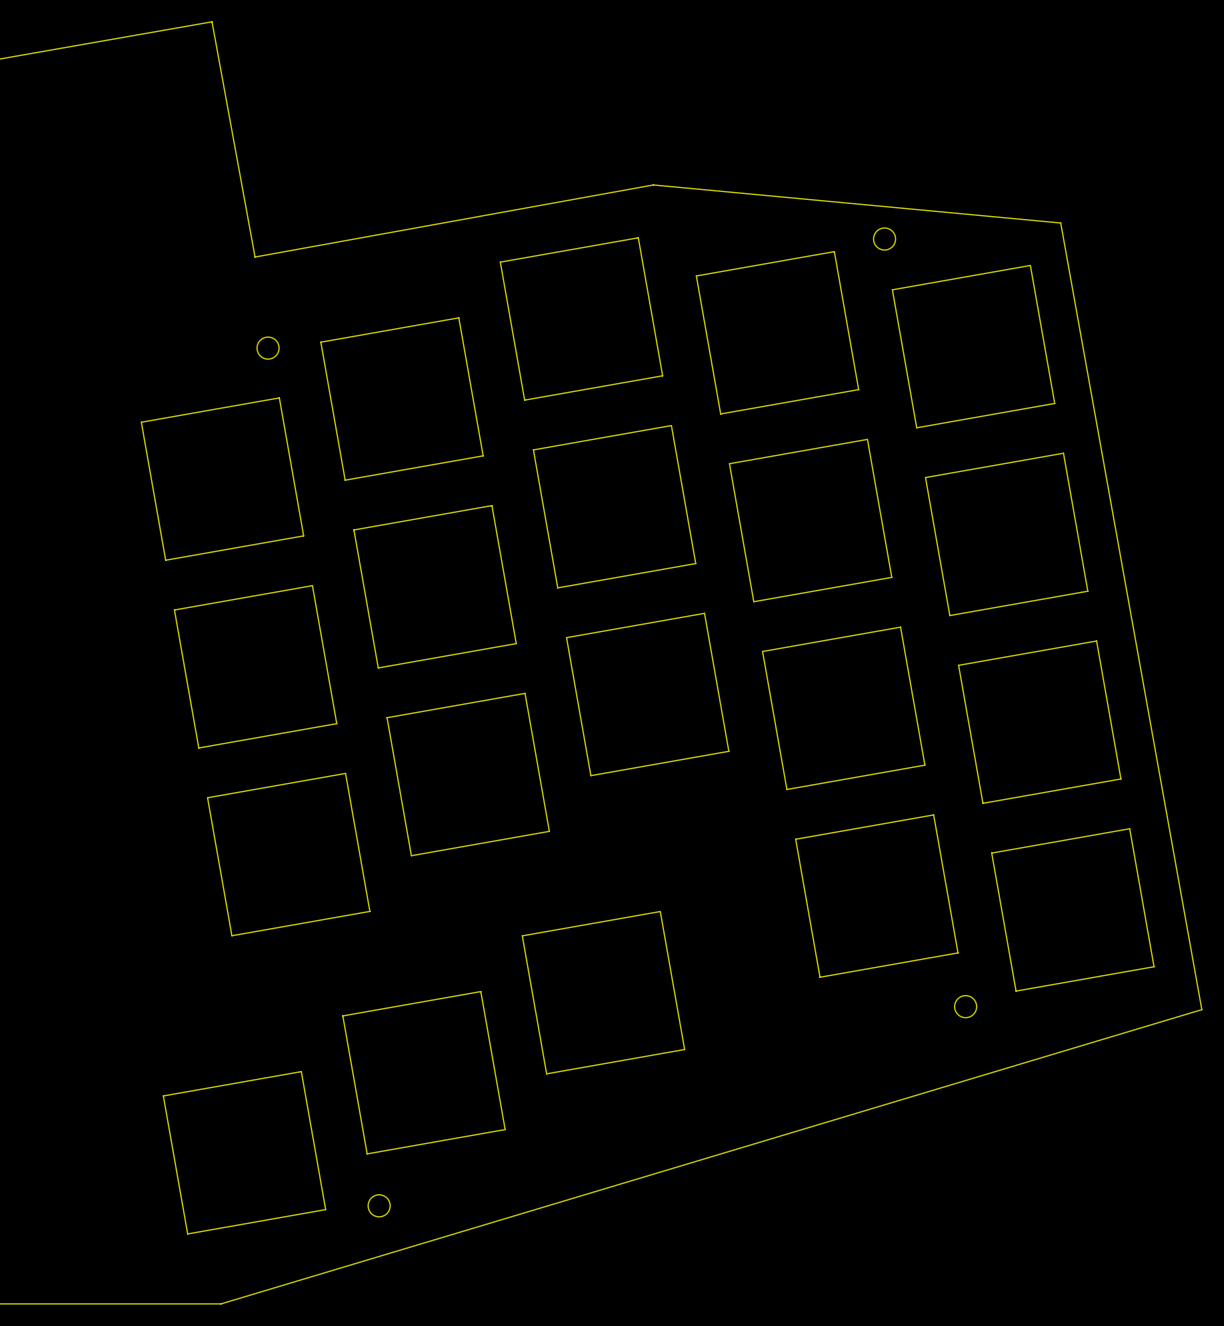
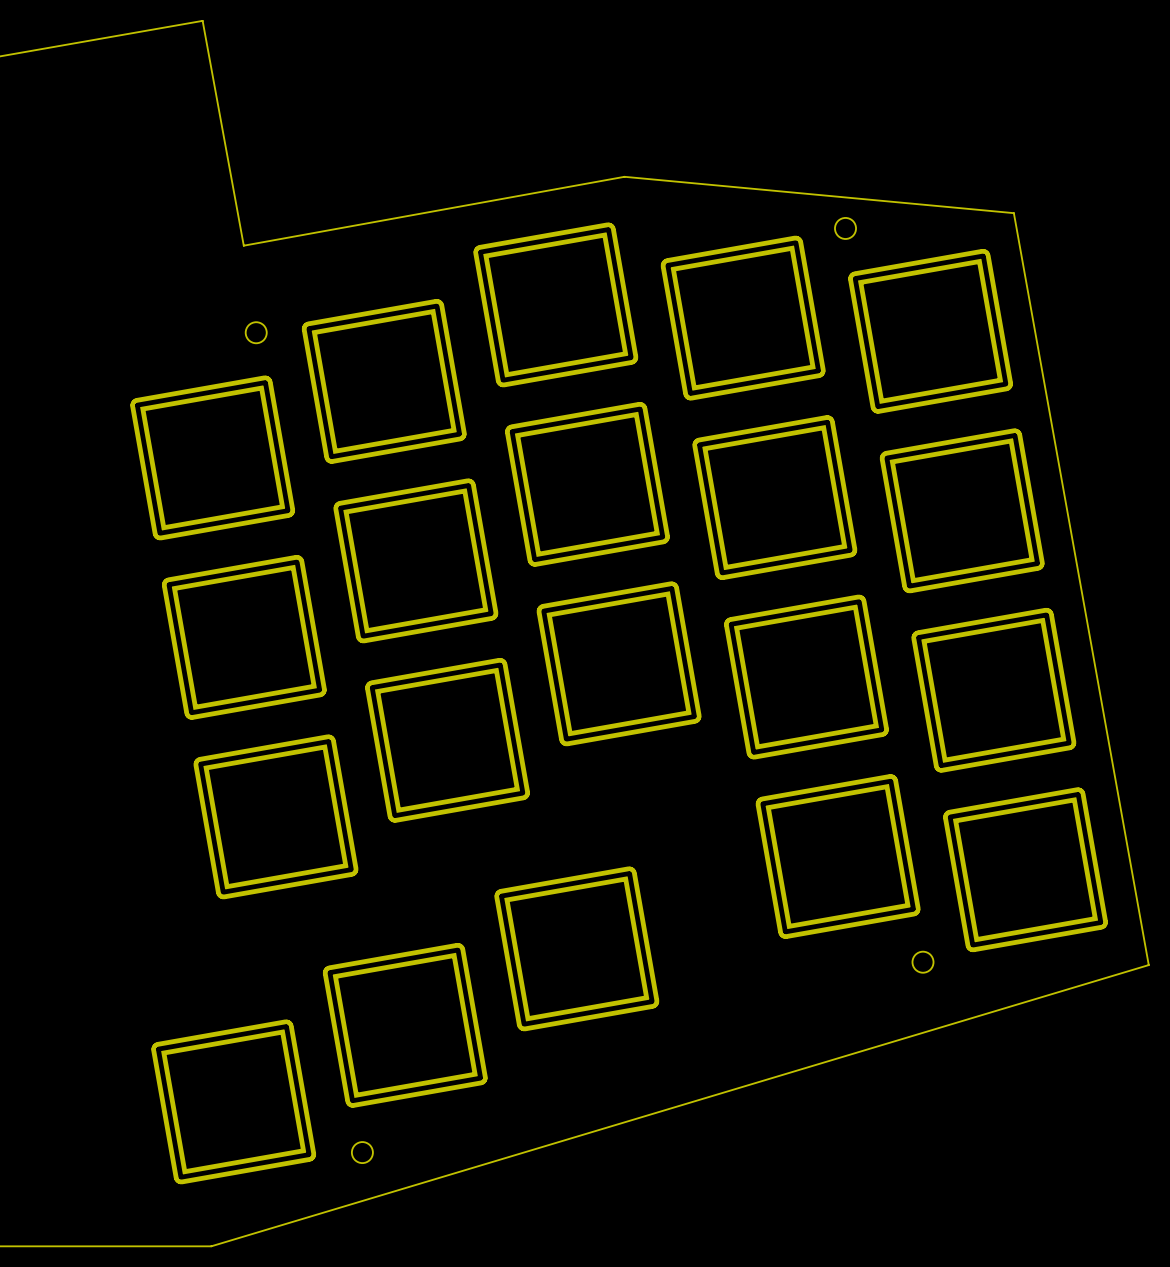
drawing: [499, 237, 664, 401] -> none
drawing: [532, 251, 860, 589] -> none
drawing: [565, 264, 1056, 777] -> none
drawing: [320, 317, 484, 481] -> none
part: none -> (555, 304)
part: none -> (743, 318)
part: none -> (930, 331)
drawing: [140, 397, 305, 561] -> none
part: none -> (384, 381)
drawing: [761, 452, 1089, 791] -> none
part: none -> (212, 457)
drawing: [353, 505, 517, 669] -> none
part: none -> (587, 484)
part: none -> (774, 497)
part: none -> (962, 510)
drawing: [173, 585, 338, 749] -> none
part: none -> (415, 560)
drawing: [795, 640, 1122, 978] -> none
part: none -> (244, 637)
drawing: [386, 692, 550, 857] -> none
part: none -> (619, 663)
part: none -> (806, 677)
part: none -> (993, 690)
drawing: [206, 772, 371, 937] -> none
part: none -> (447, 740)
drawing: [991, 828, 1155, 992] -> none
part: none -> (275, 816)
part: none -> (838, 856)
part: none -> (1025, 869)
drawing: [521, 910, 686, 1075] -> none
drawing: [342, 990, 506, 1155] -> none
part: none -> (576, 948)
drawing: [162, 1071, 327, 1235] -> none
part: none -> (405, 1025)
part: none -> (233, 1101)

